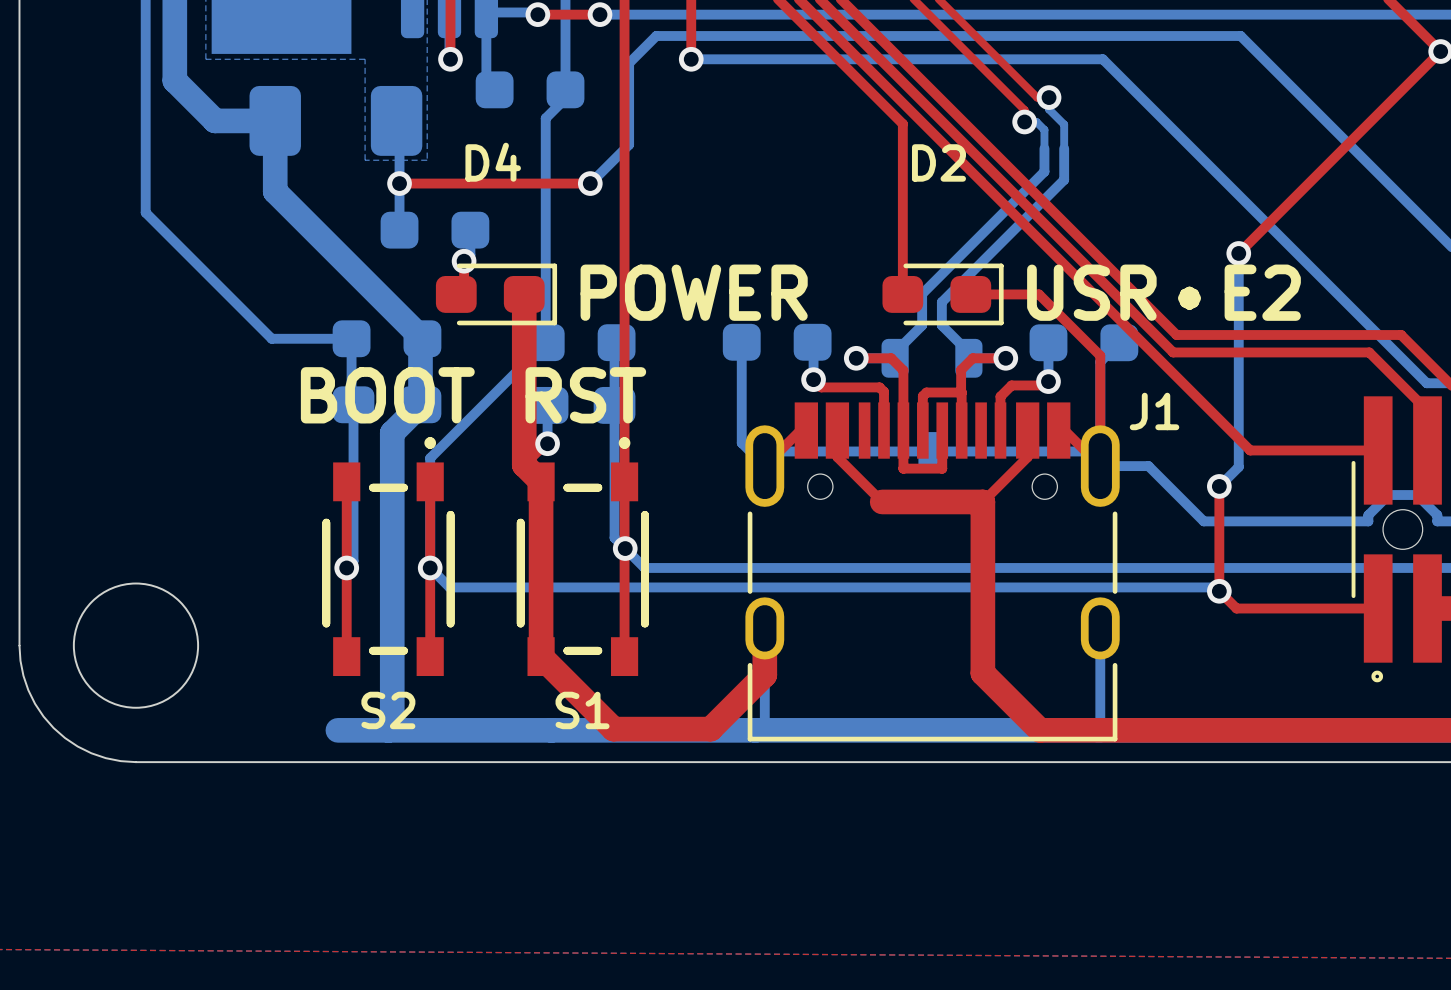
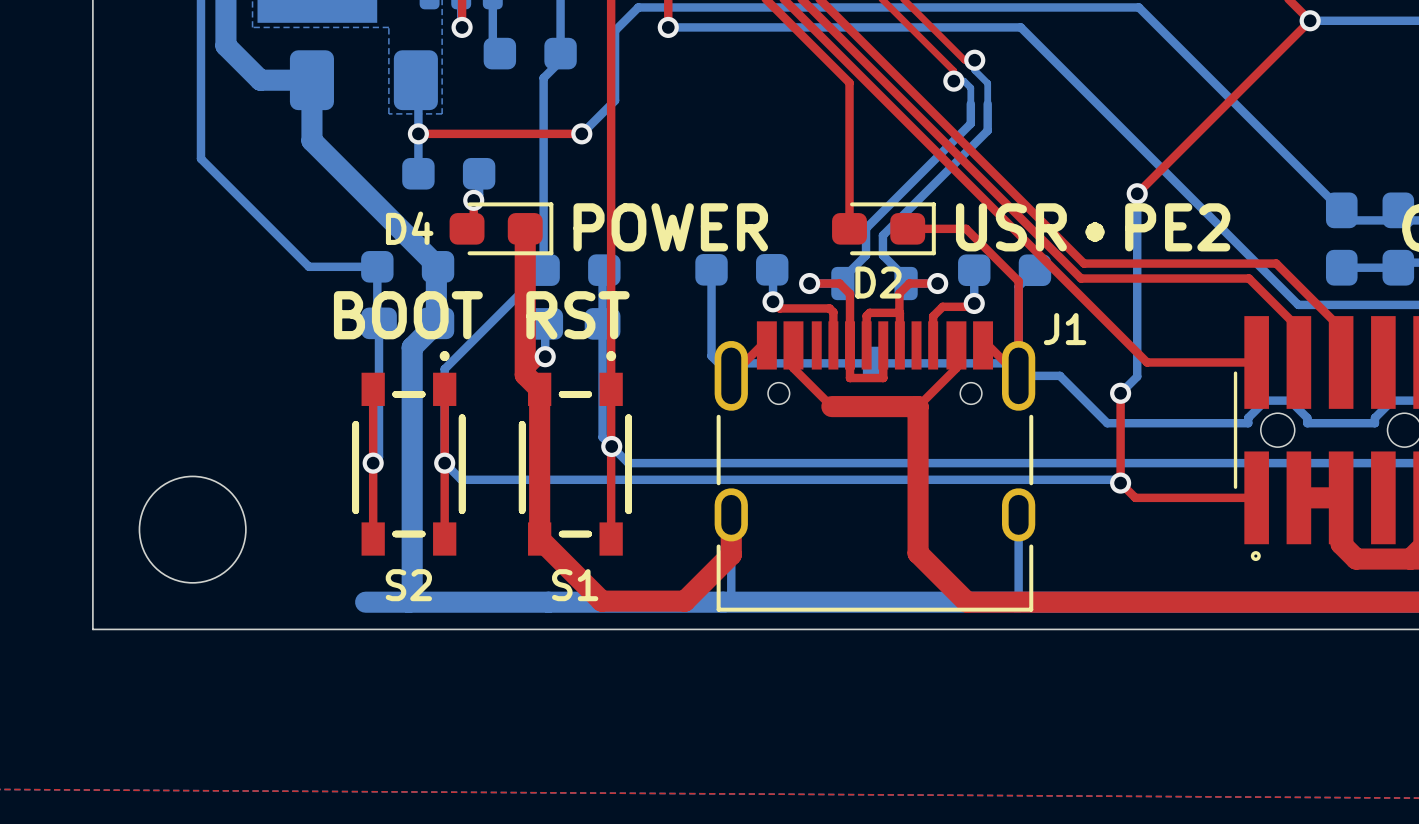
D4 name position: D4 (493, 162) -> D4 (409, 228)
D2 name position: D2 (938, 162) -> D2 (878, 282)
text: USR•E2 (1163, 292) -> USR•PE2 (1093, 227)
board edge: (19, 645) (23, 675) (28, 690) (43, 716) (53, 728) (77, 746) (91, 753) (105, 758) (135, 762) -> (92, 529) (92, 629) (192, 629)

